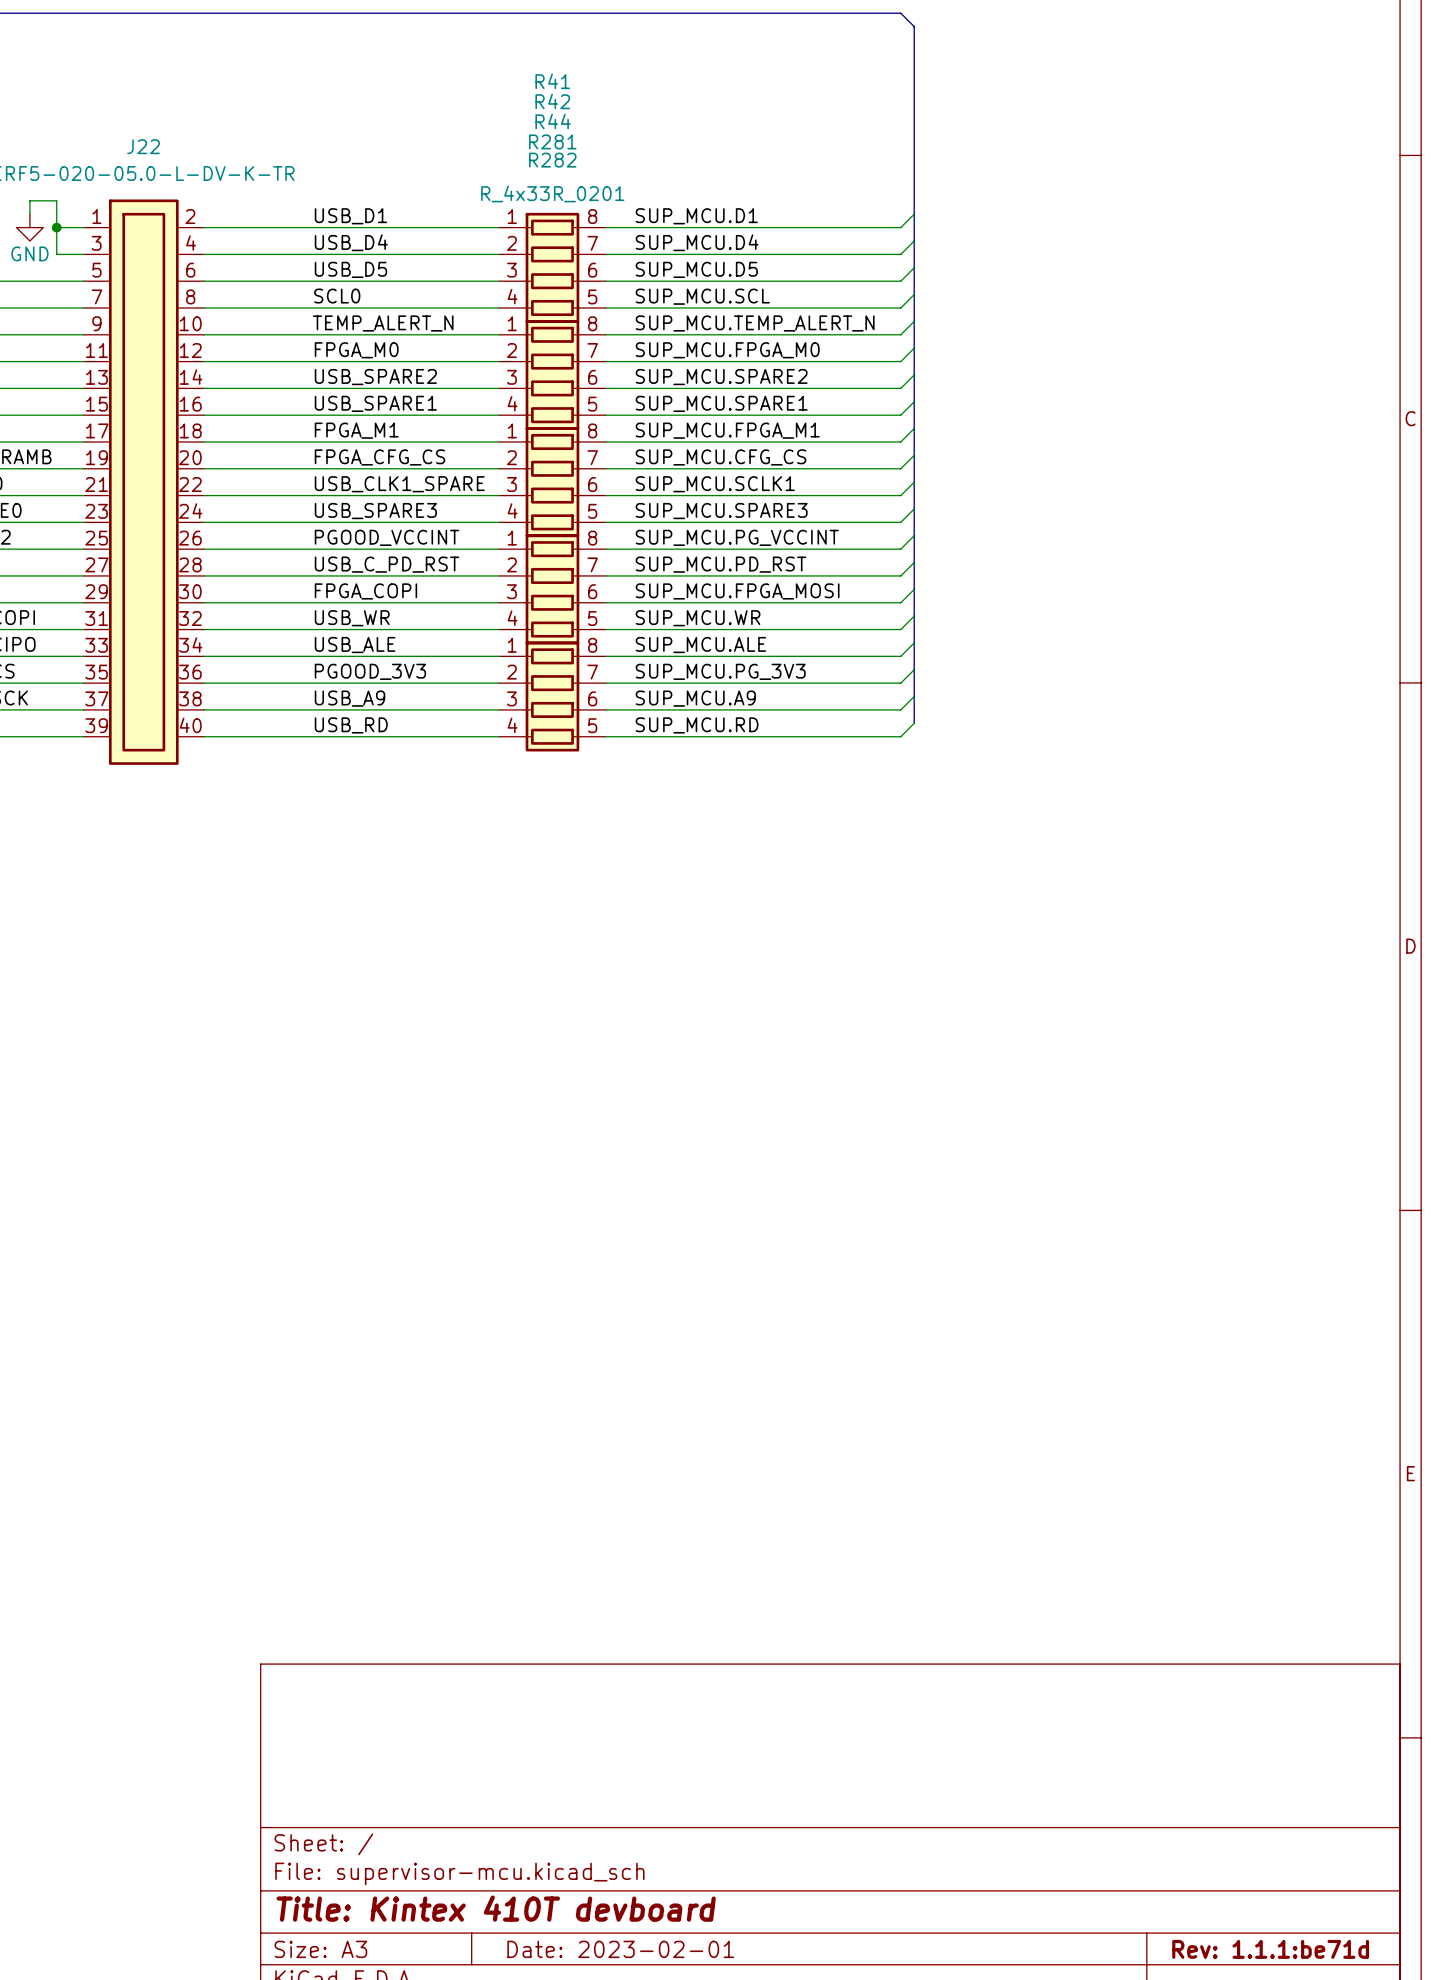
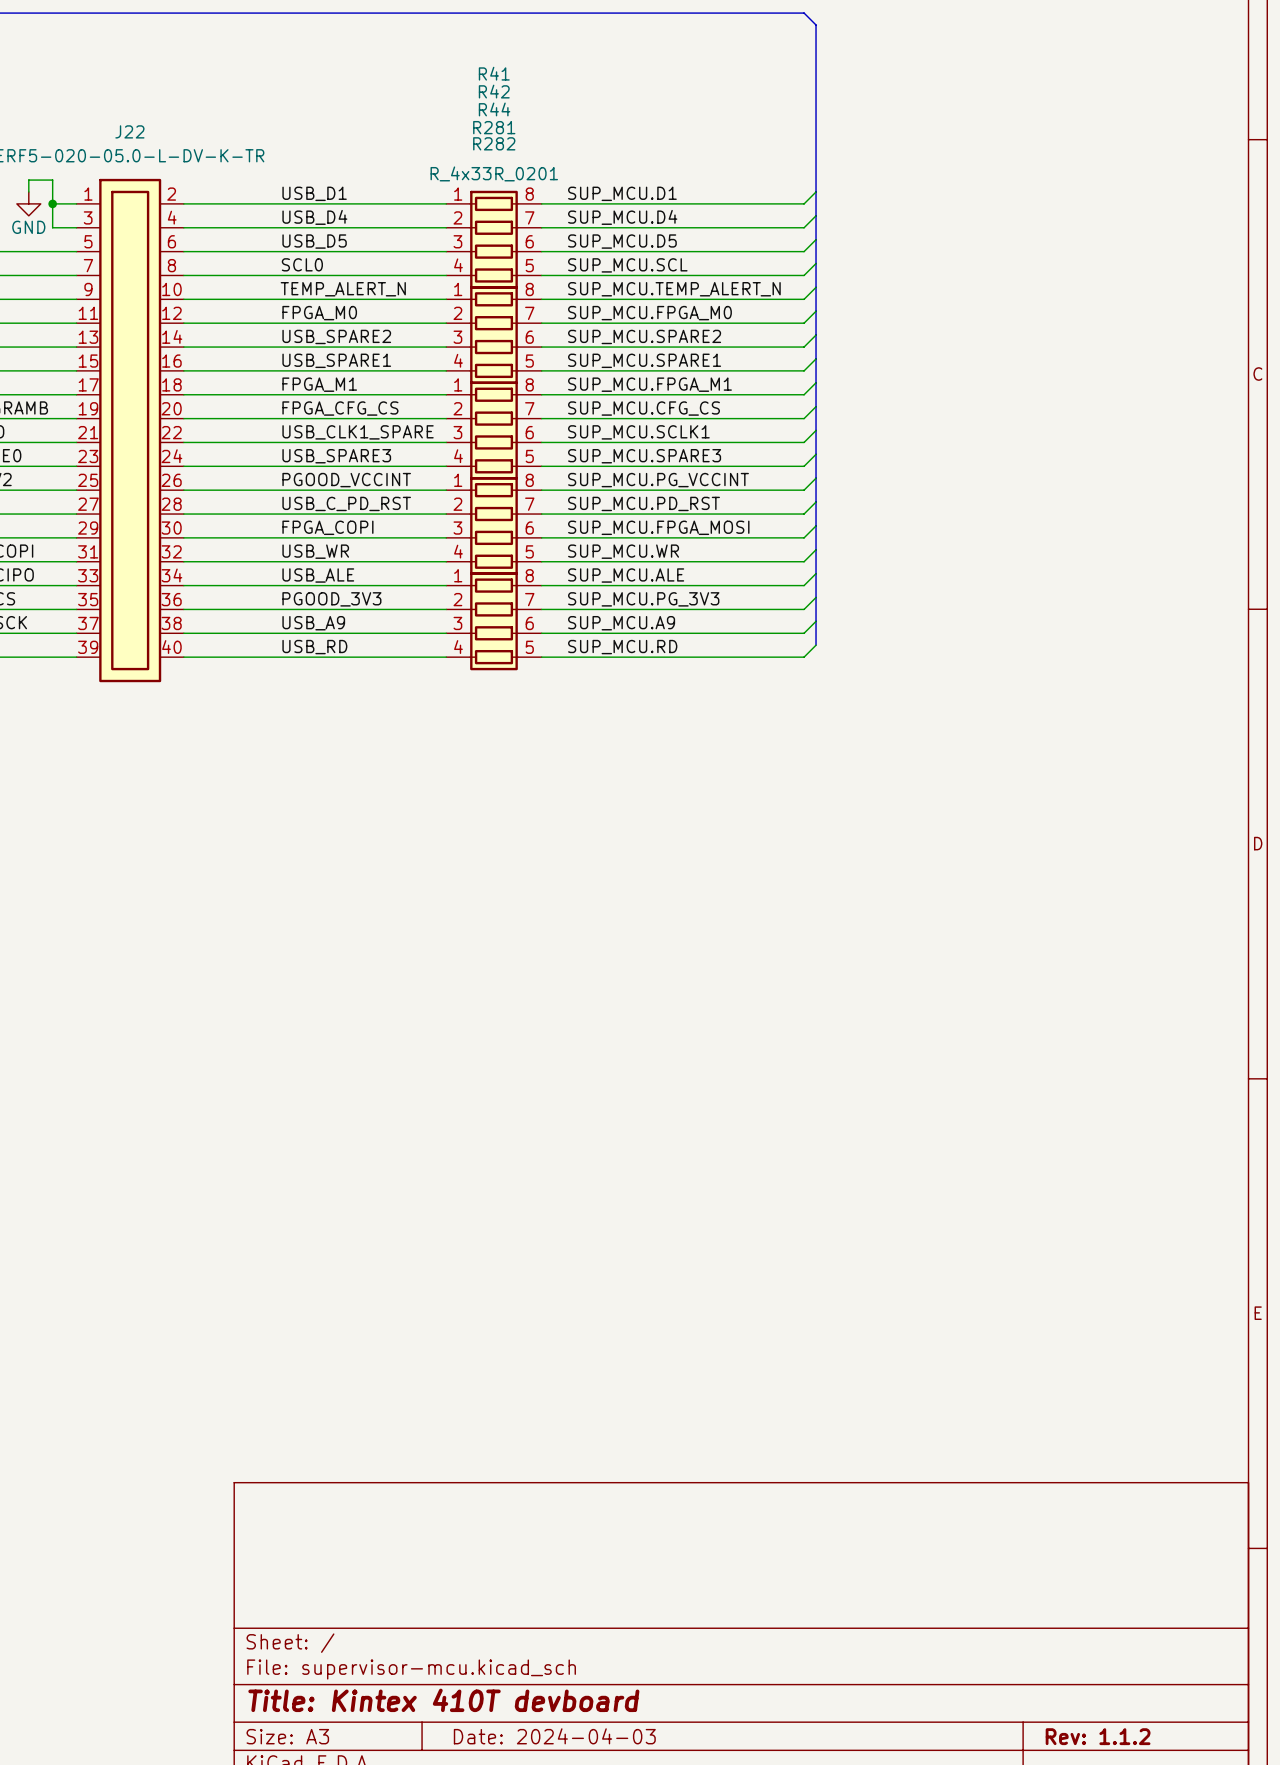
title block: Date: 2023-02-01 (620, 1949) -> Date: 2024-04-03 (554, 1736)
title block: Rev: 1.1.1:be71d (1270, 1949) -> Rev: 1.1.2 (1098, 1736)

